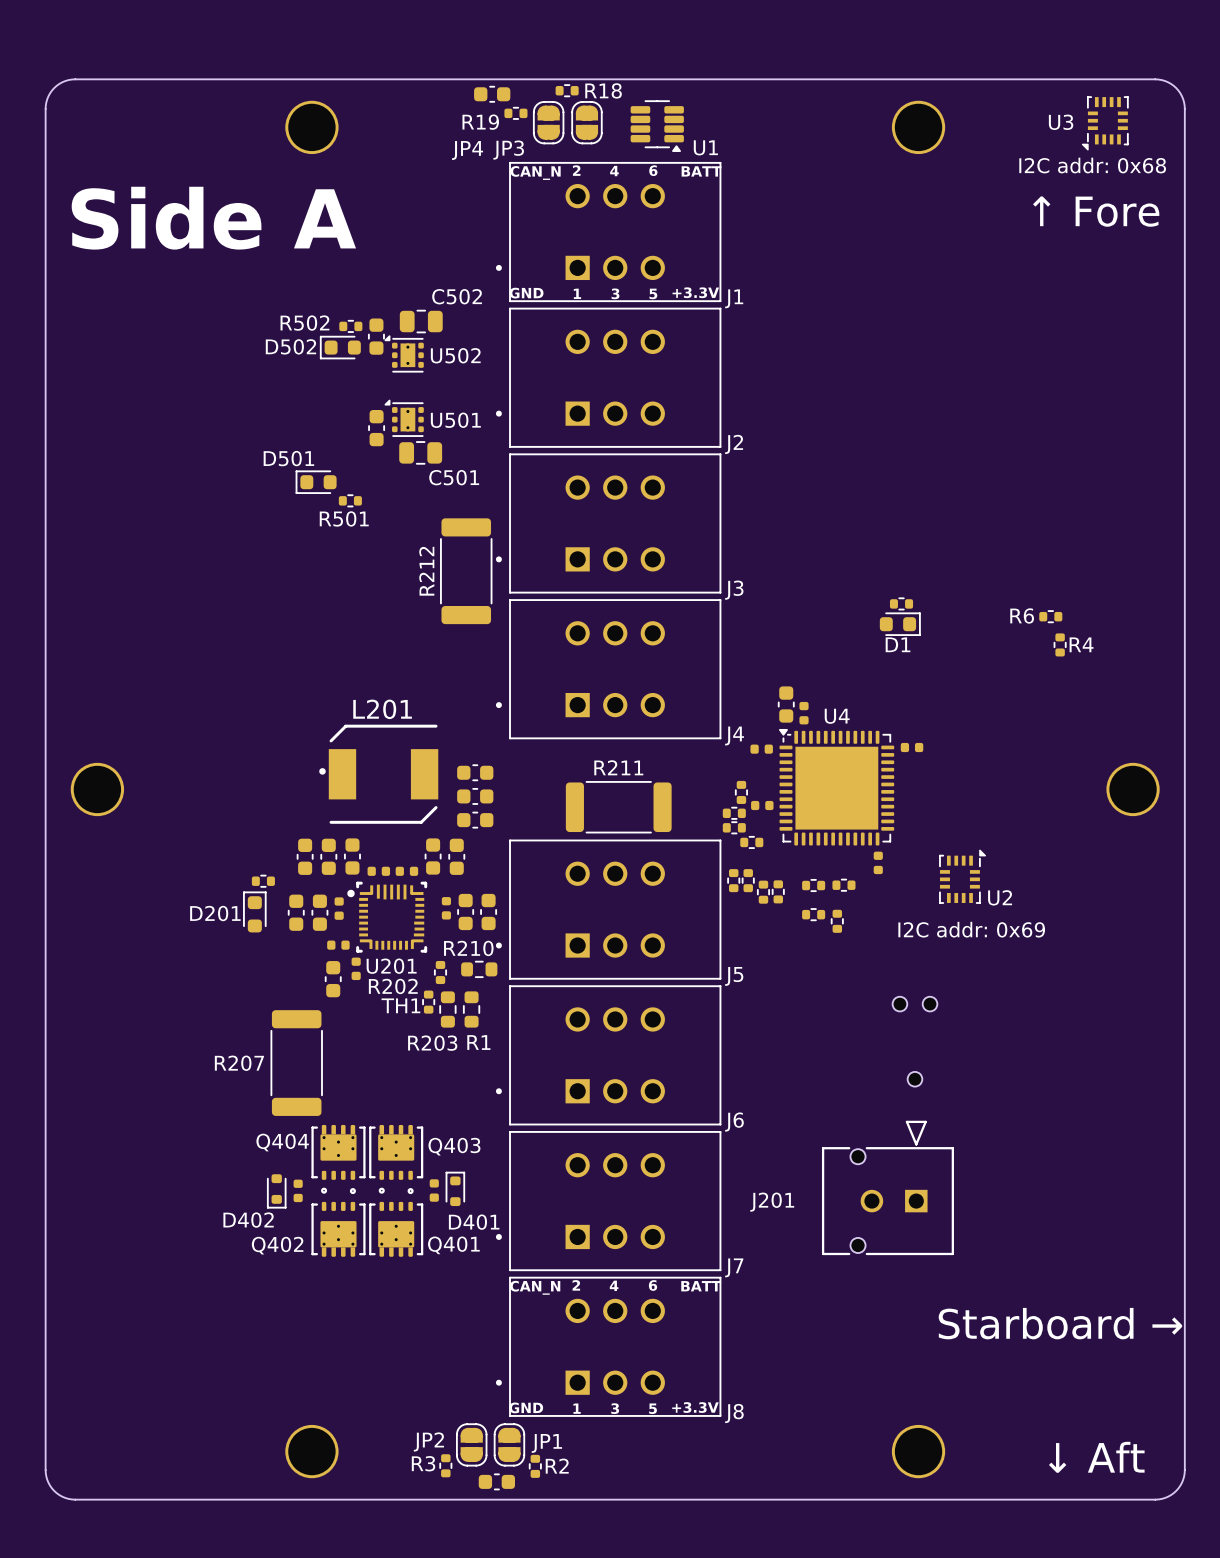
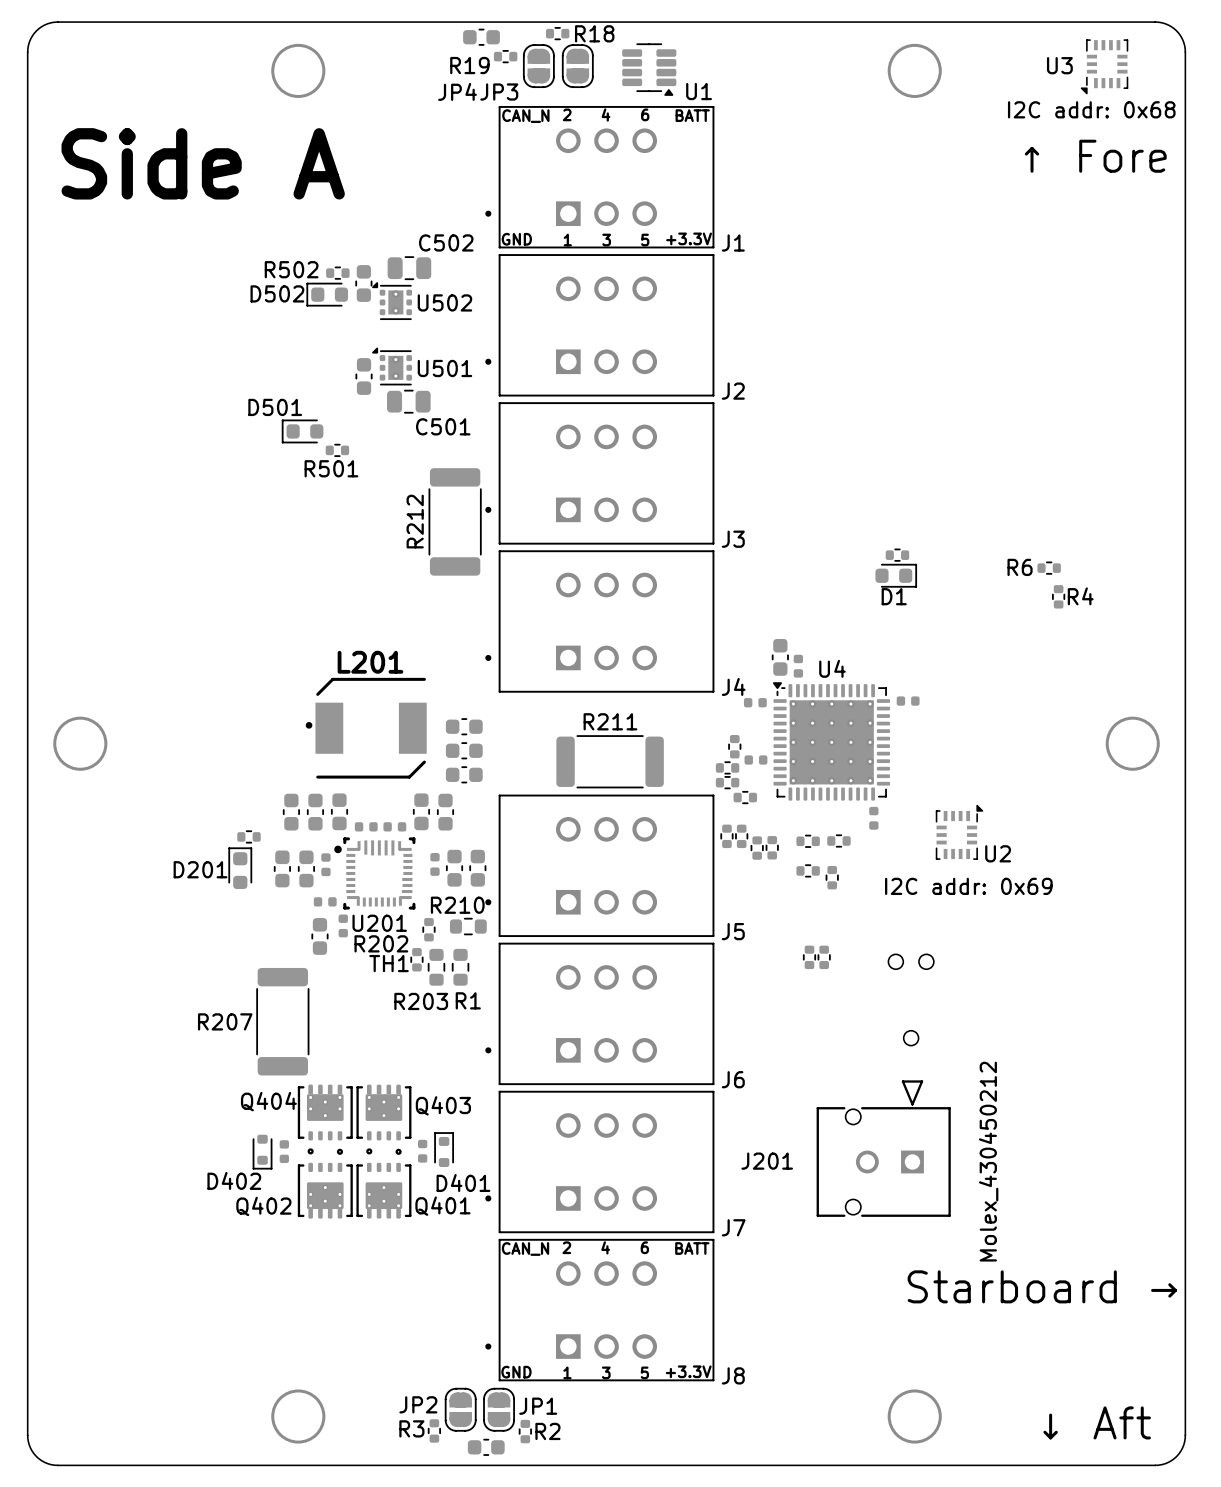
U4 footprint: [779, 728, 895, 846] -> [772, 682, 891, 801]
part: none -> (809, 957)
part: none -> (824, 957)
J201 text: none -> Molex_430450212 (988, 1161)

